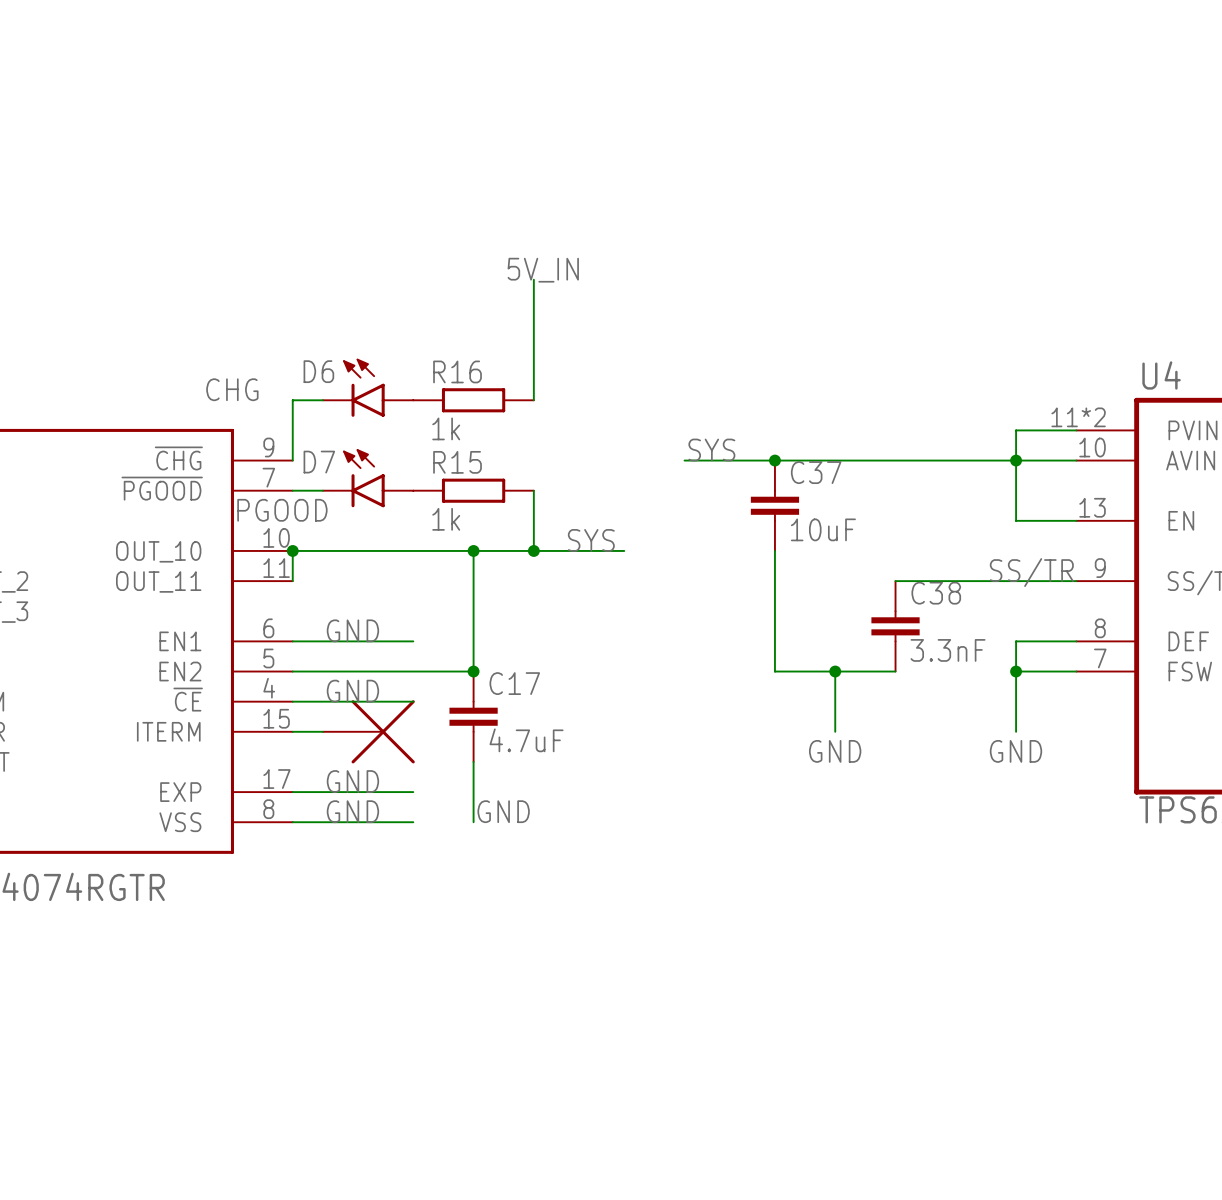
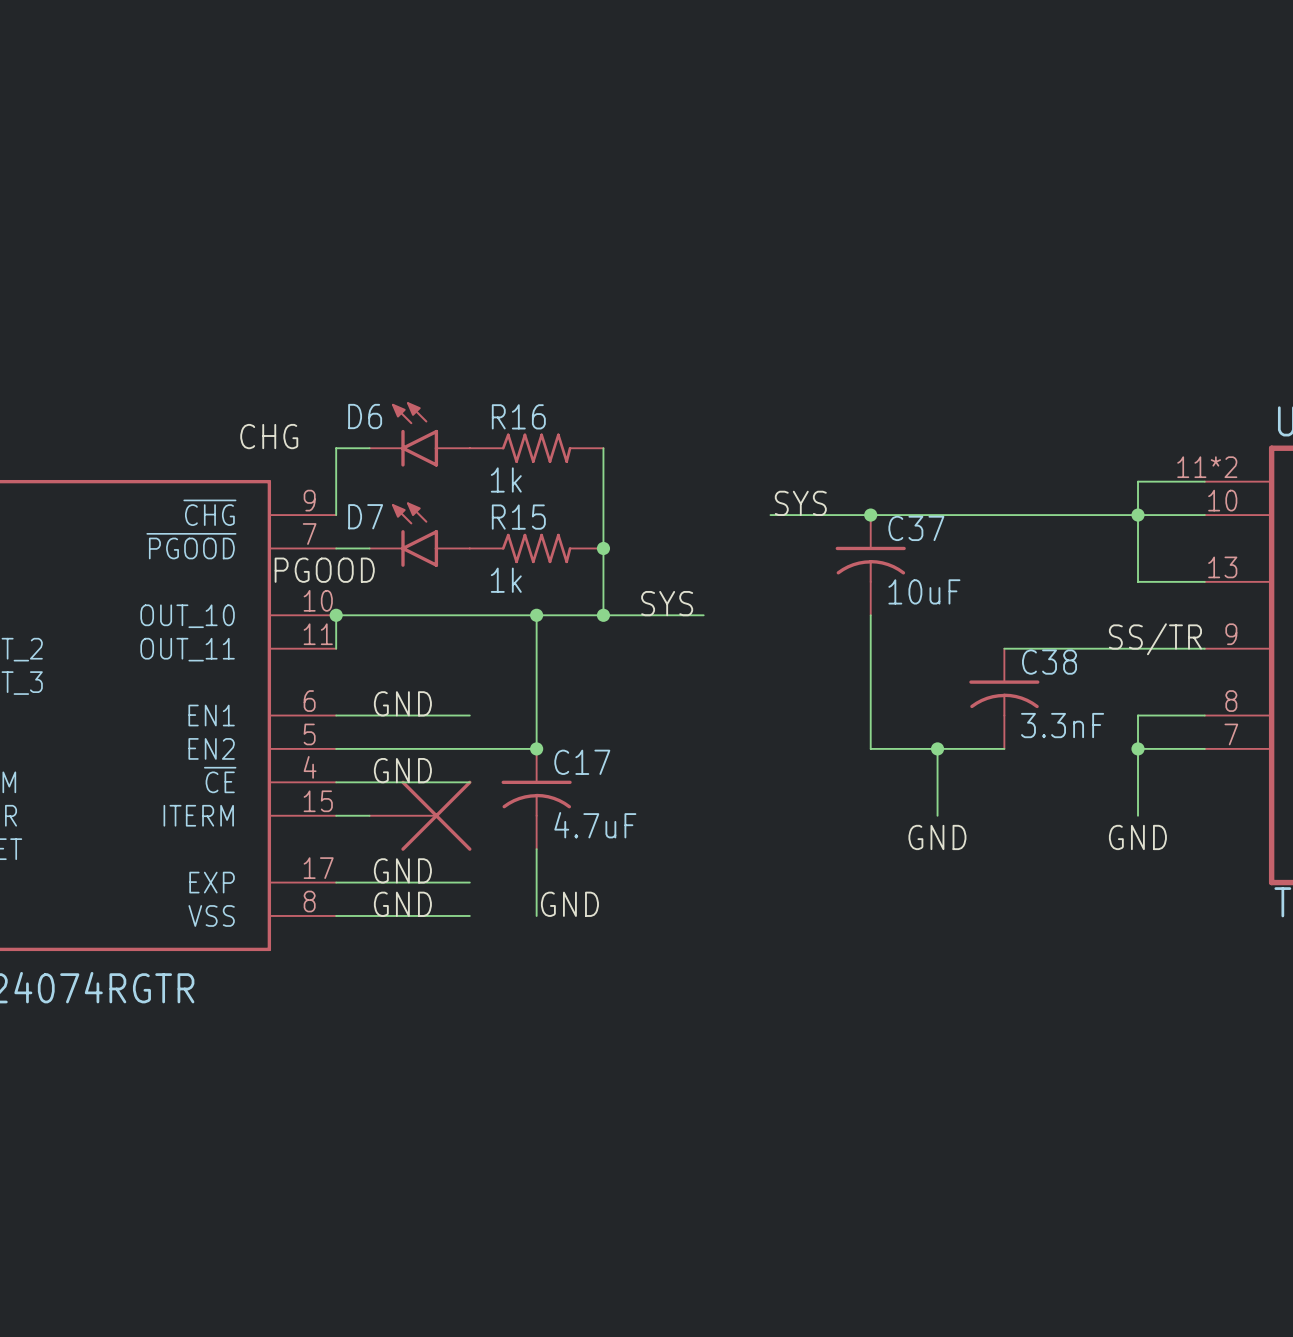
label: 5V_IN (543, 270) -> none
wire: (533, 279) (533, 400) -> (603, 548) (603, 448)
R16 symbol: [413, 388, 534, 413] -> [469, 433, 604, 463]
C37 symbol: [750, 460, 800, 551] -> [835, 515, 906, 616]
R15 symbol: [413, 478, 534, 503] -> [469, 533, 604, 564]
junction: none -> (603, 548)
C38 symbol: [871, 581, 920, 672] -> [969, 648, 1040, 749]
C17 symbol: [449, 671, 498, 762] -> [501, 748, 572, 850]

